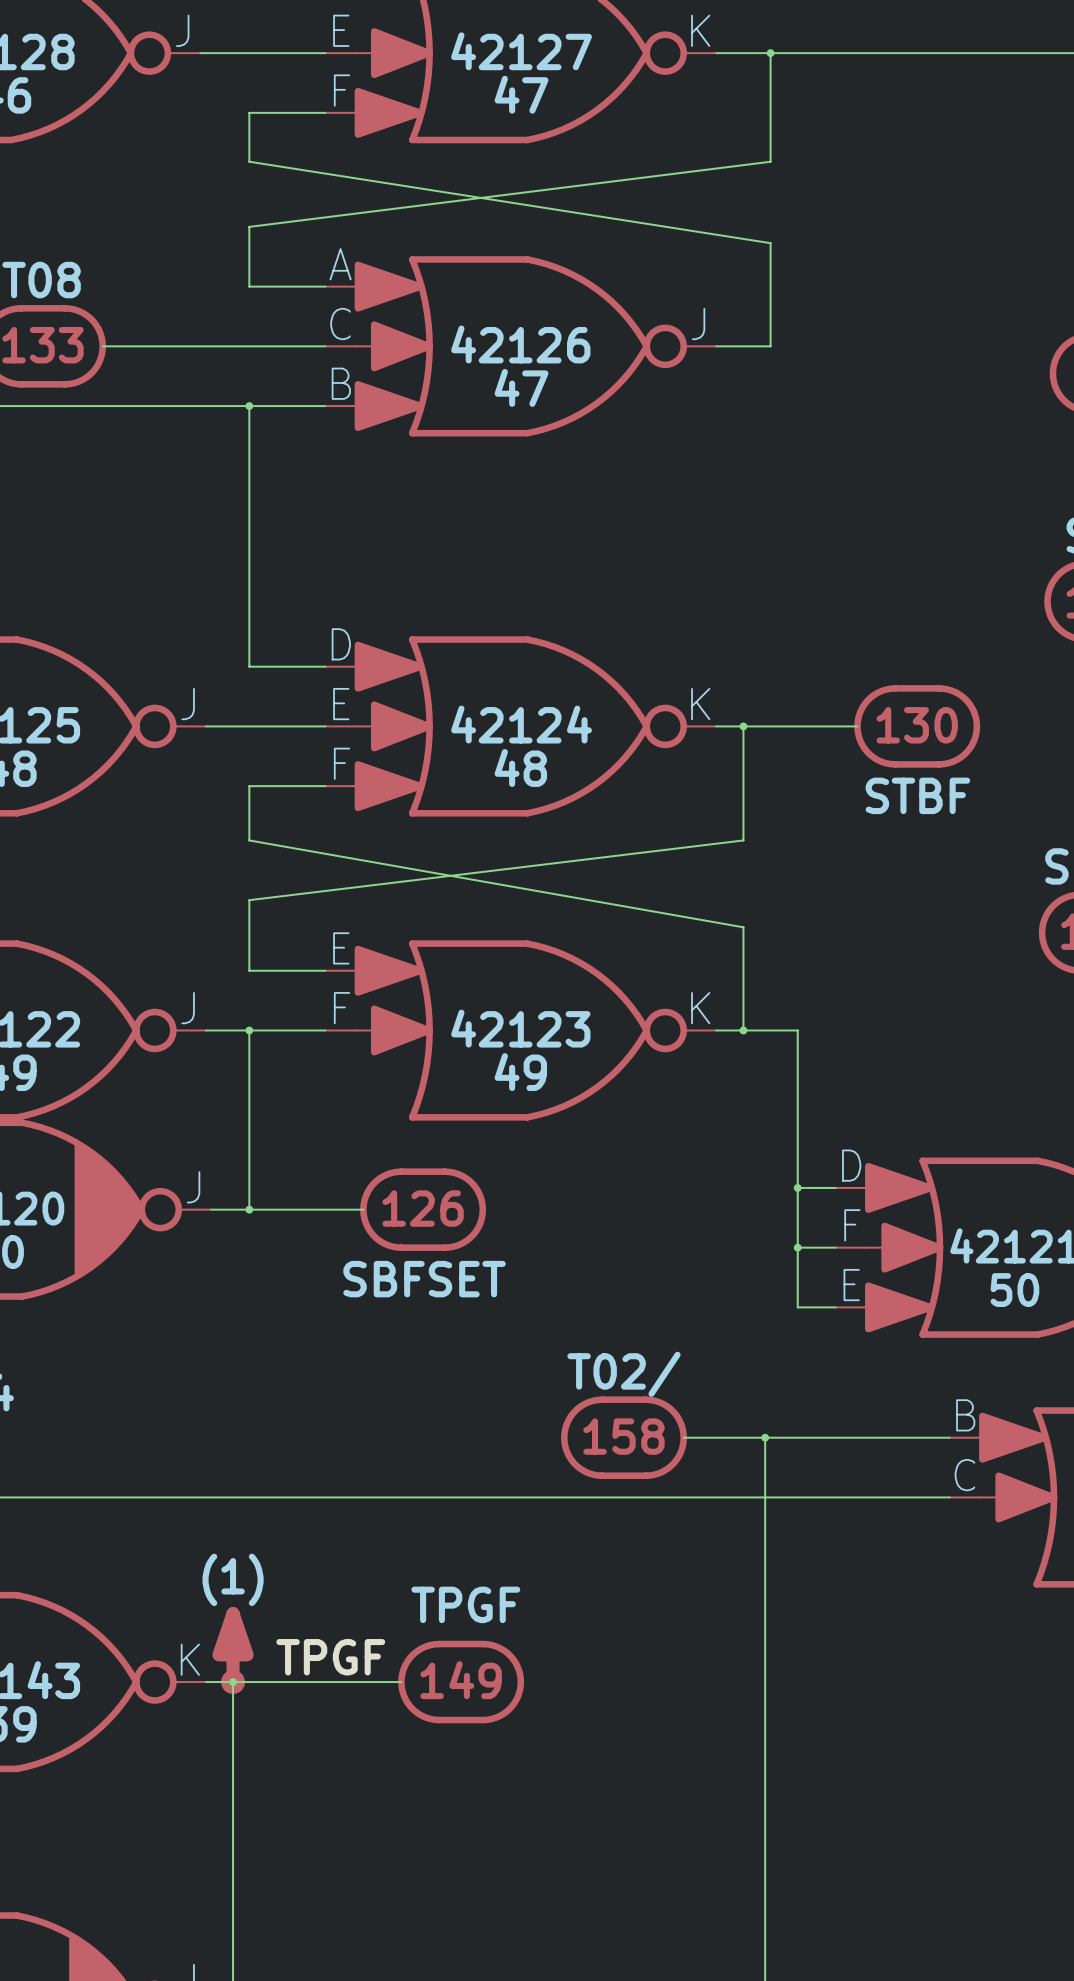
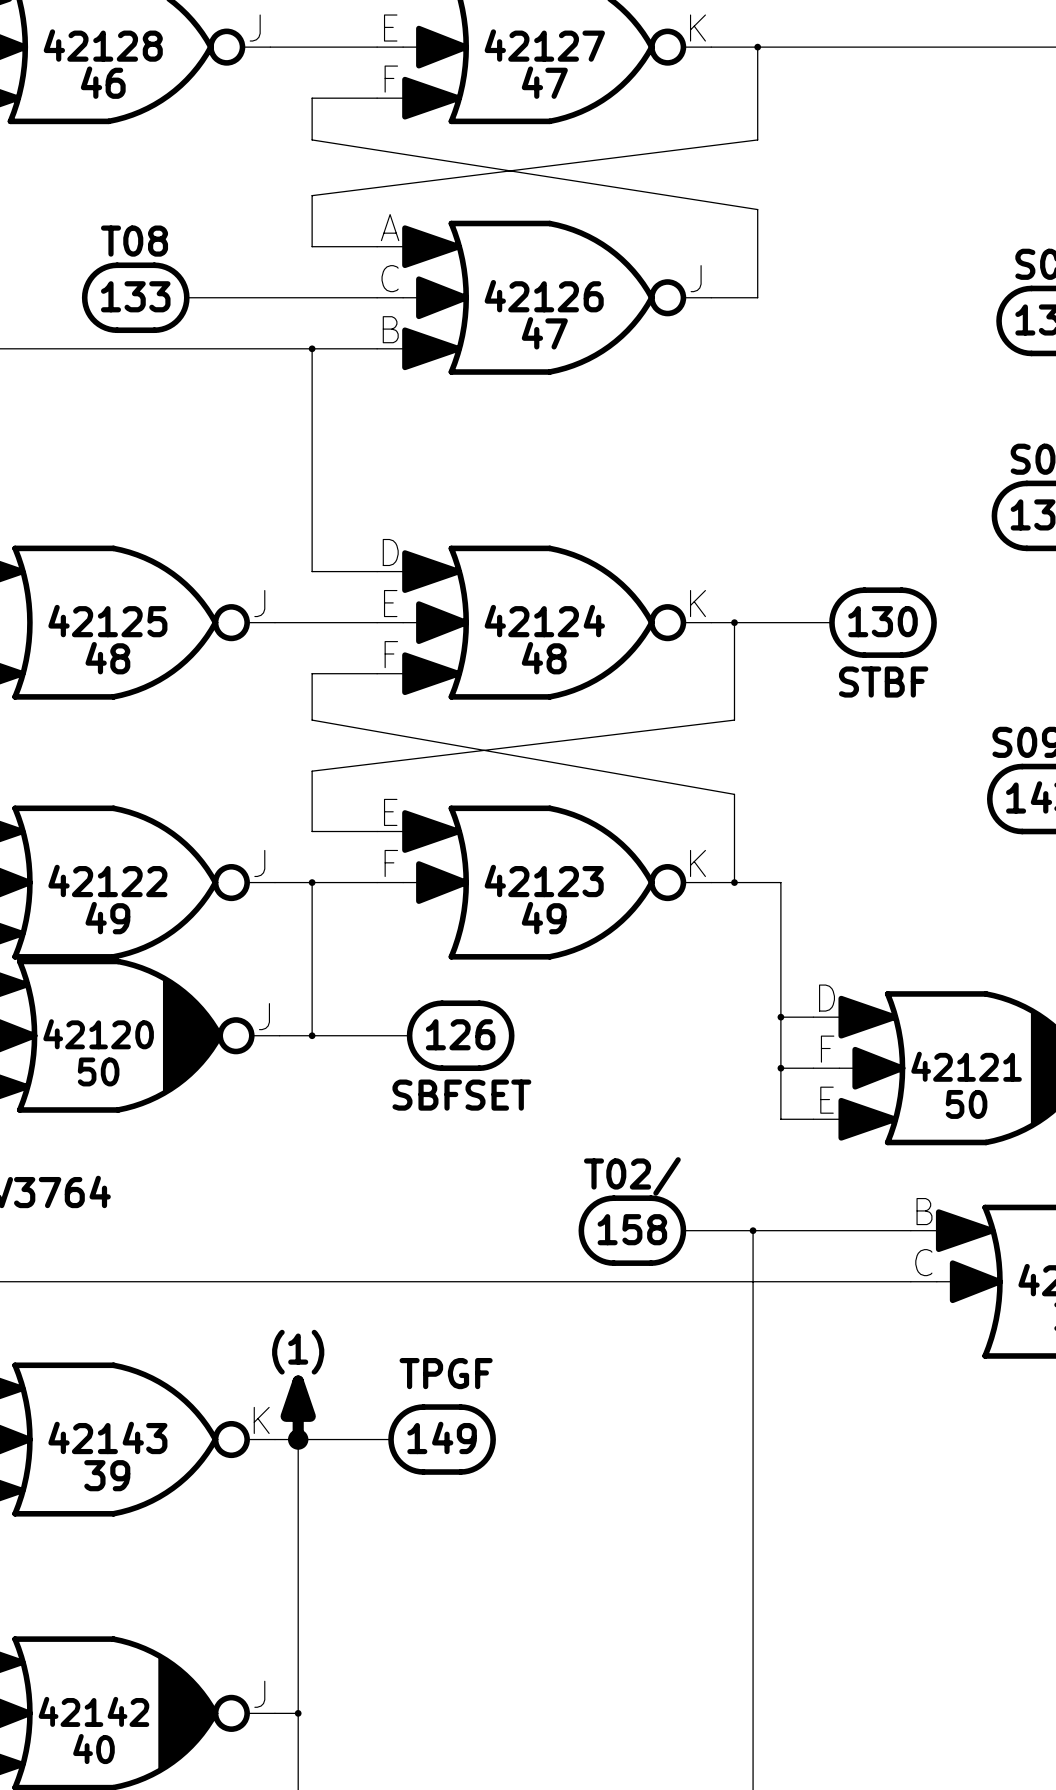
label: TPGF (330, 1657) -> none
wire: (341, 1682) (401, 1682) -> none
part position: (461, 1682) -> (442, 1439)

